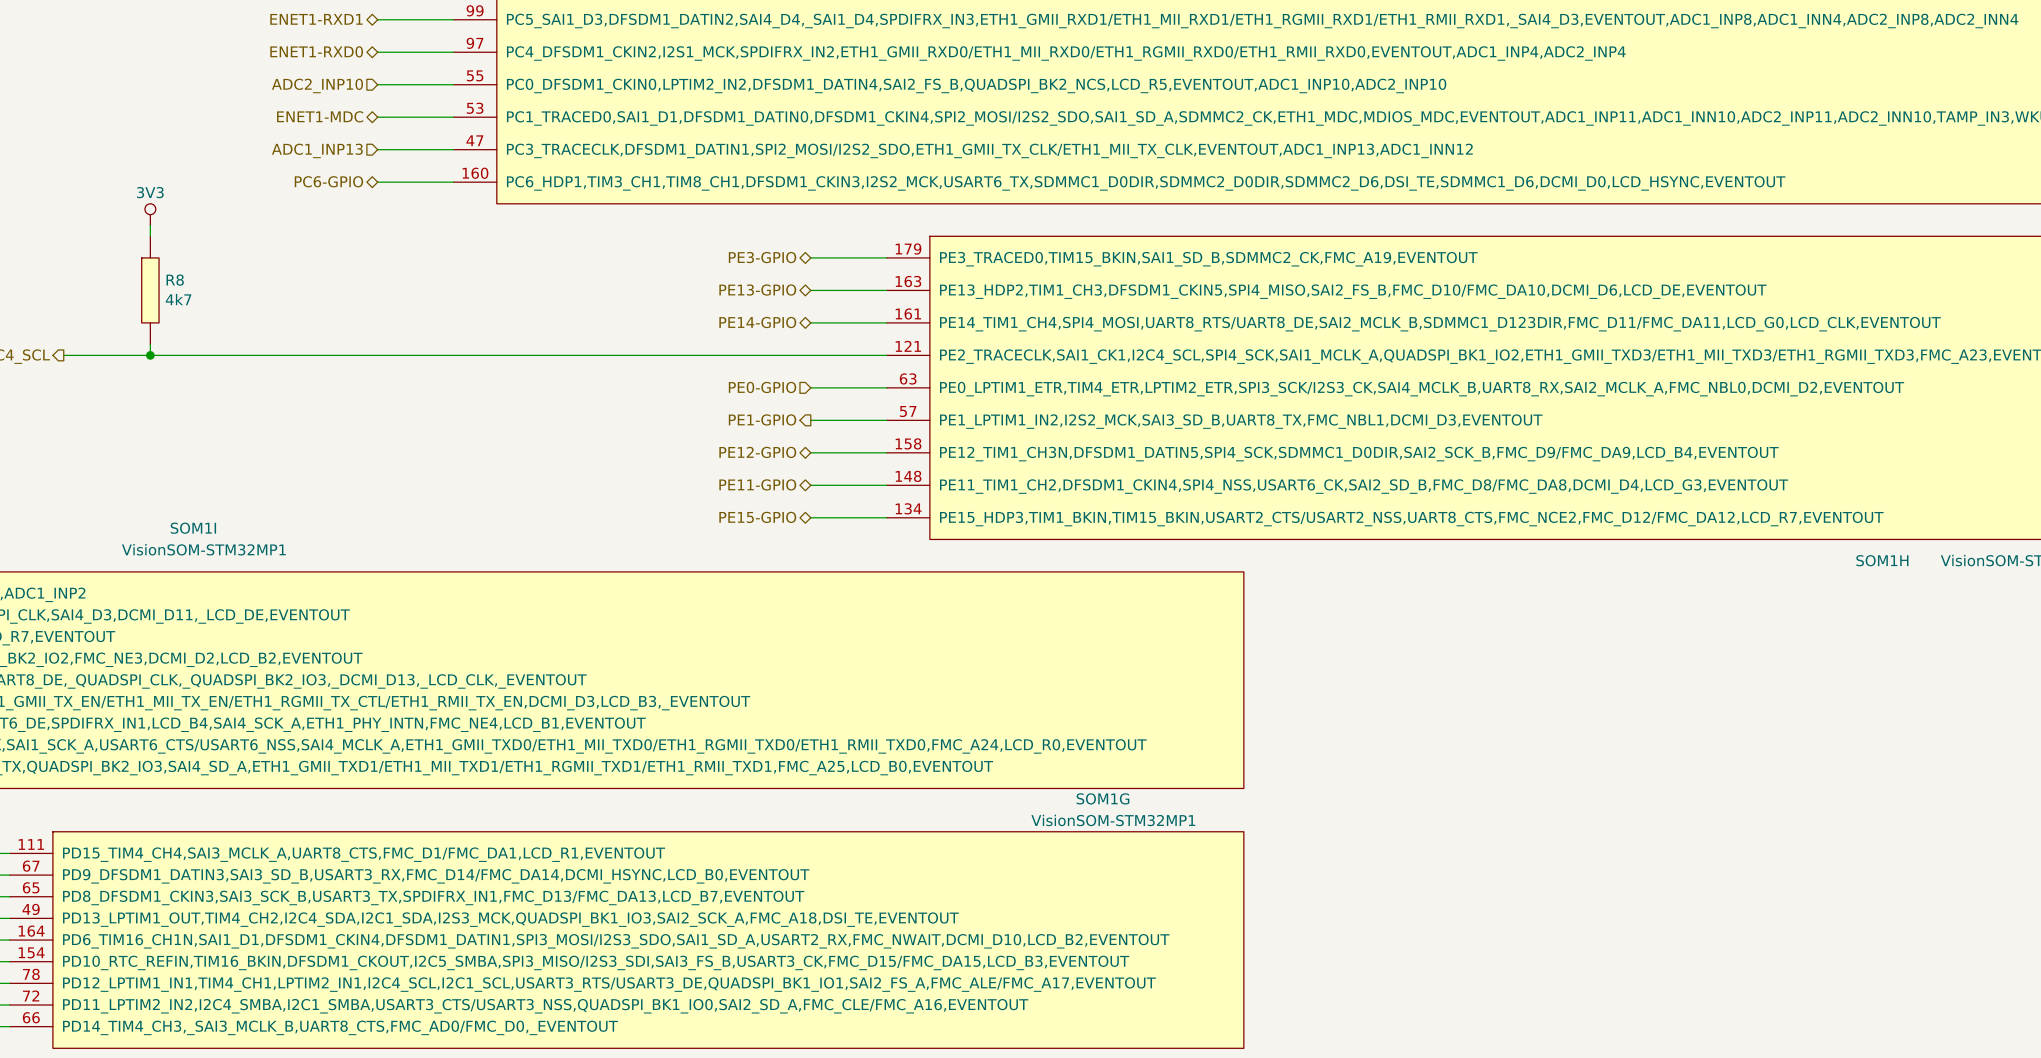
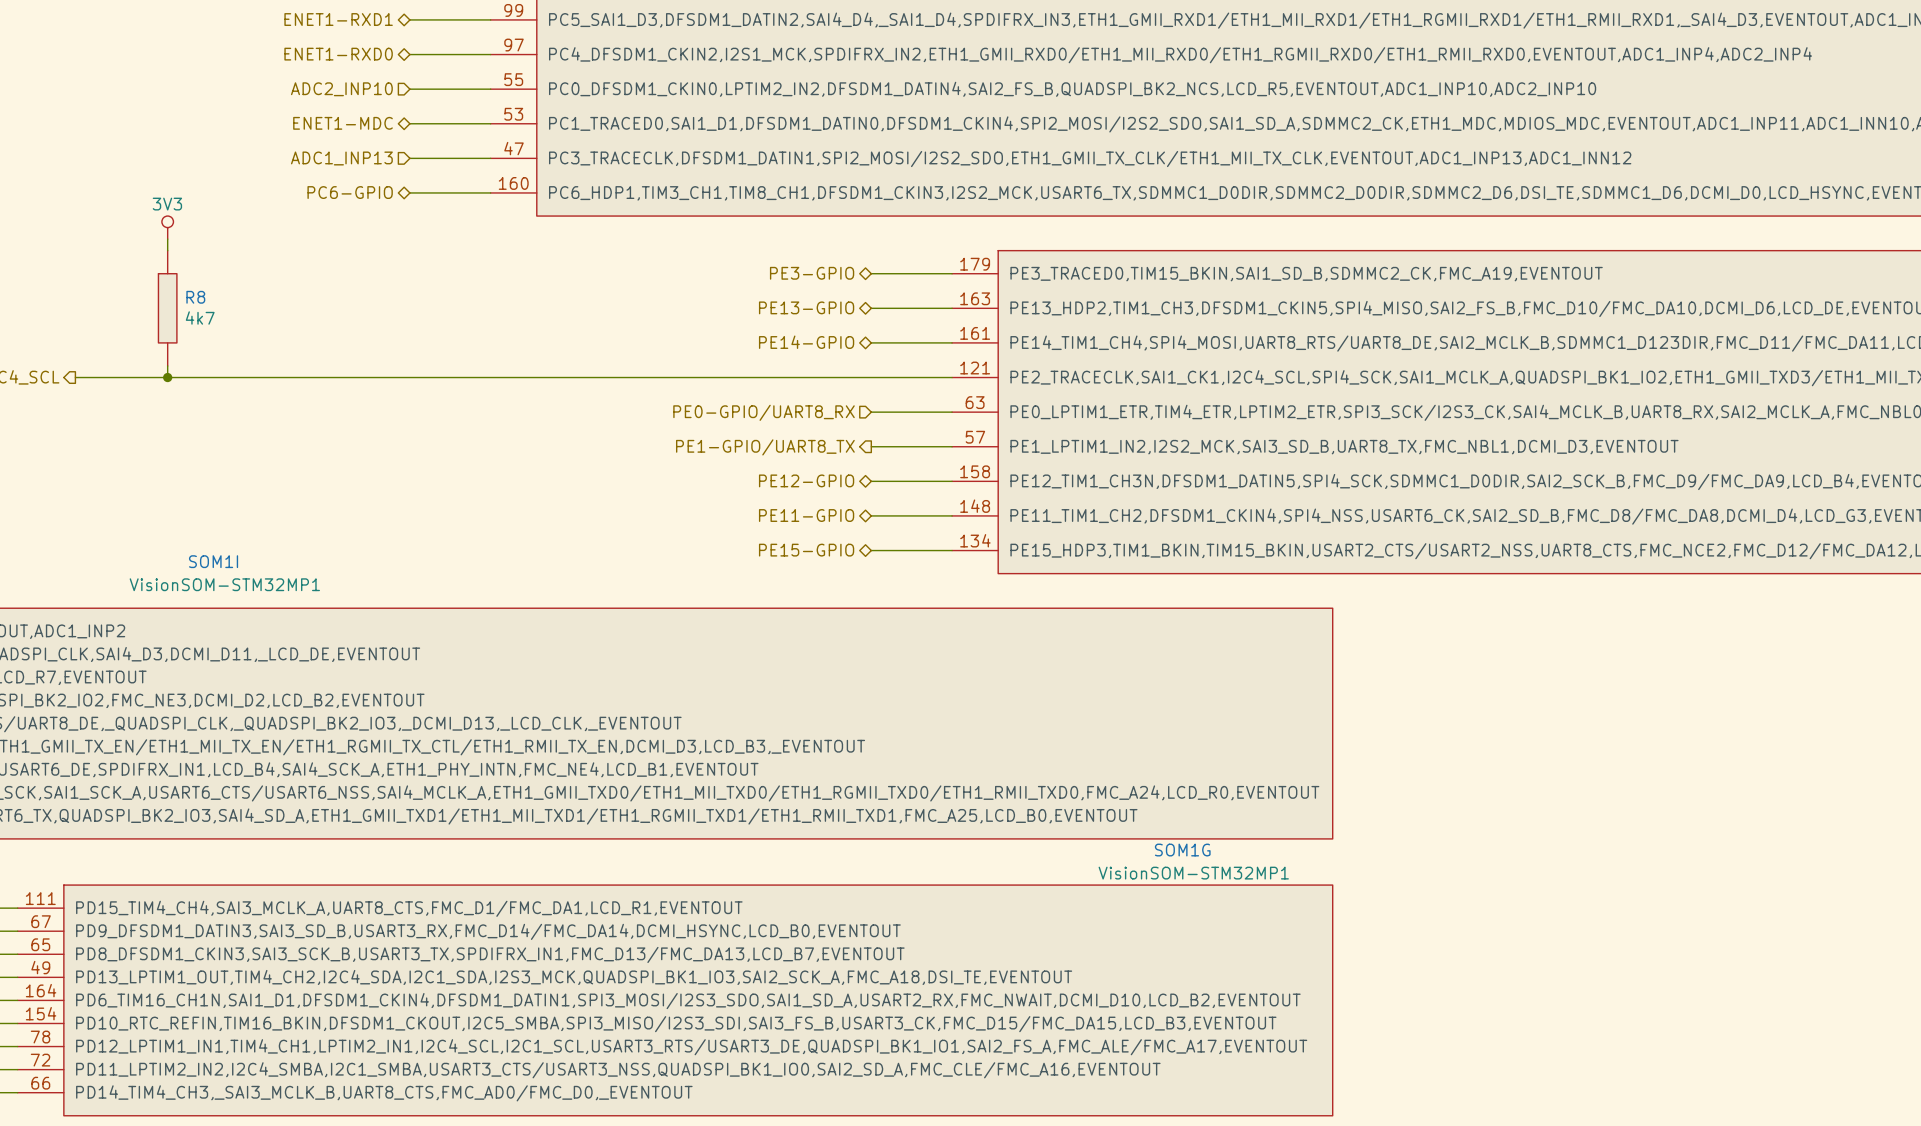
hierarchical label: PE0-GPIO (762, 387) -> PE0-GPIO/UART8_RX (764, 412)
hierarchical label: PE1-GPIO (762, 419) -> PE1-GPIO/UART8_TX (765, 447)

